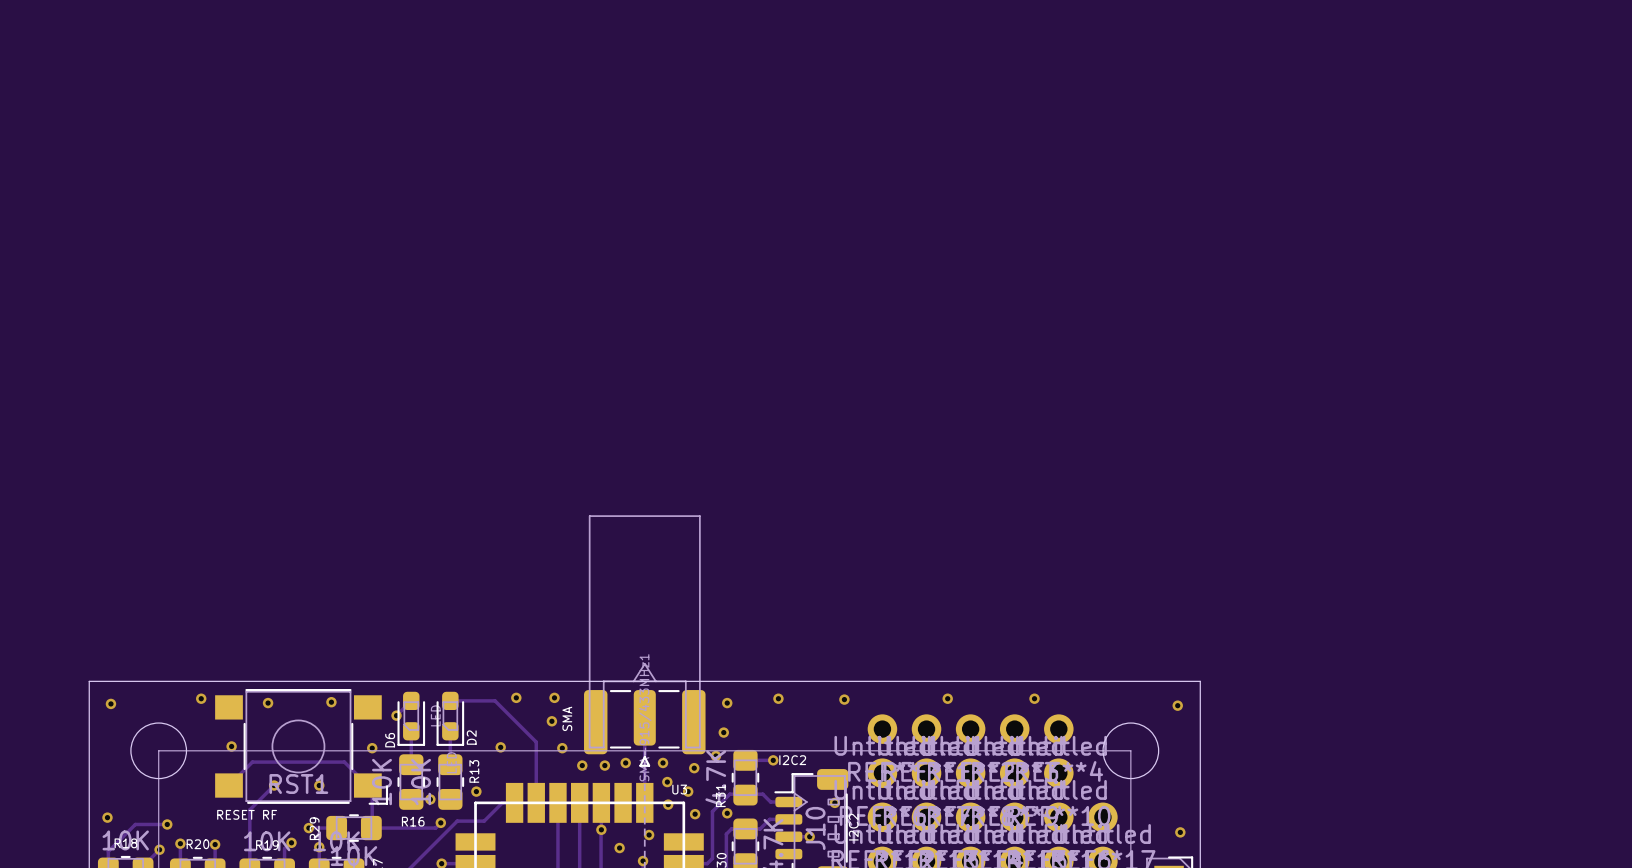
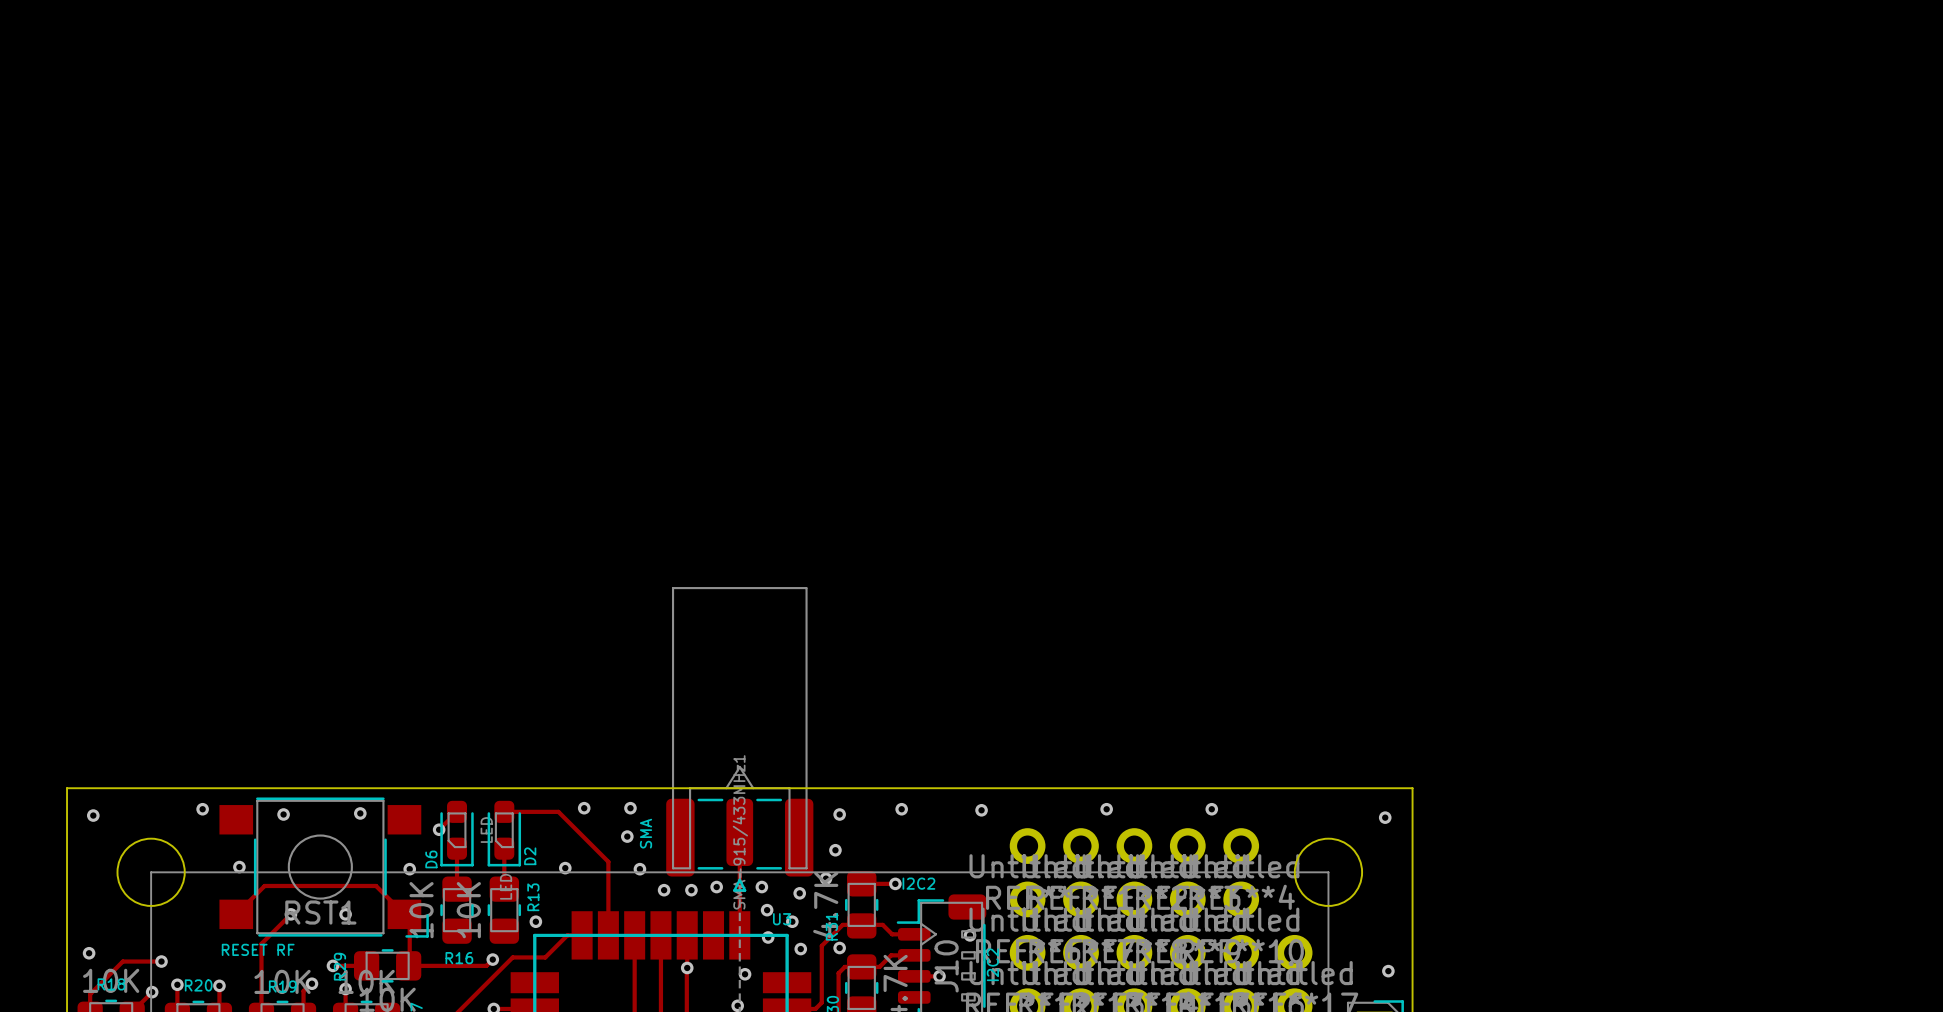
via: (430, 799) -> none
via: (619, 848) -> none

